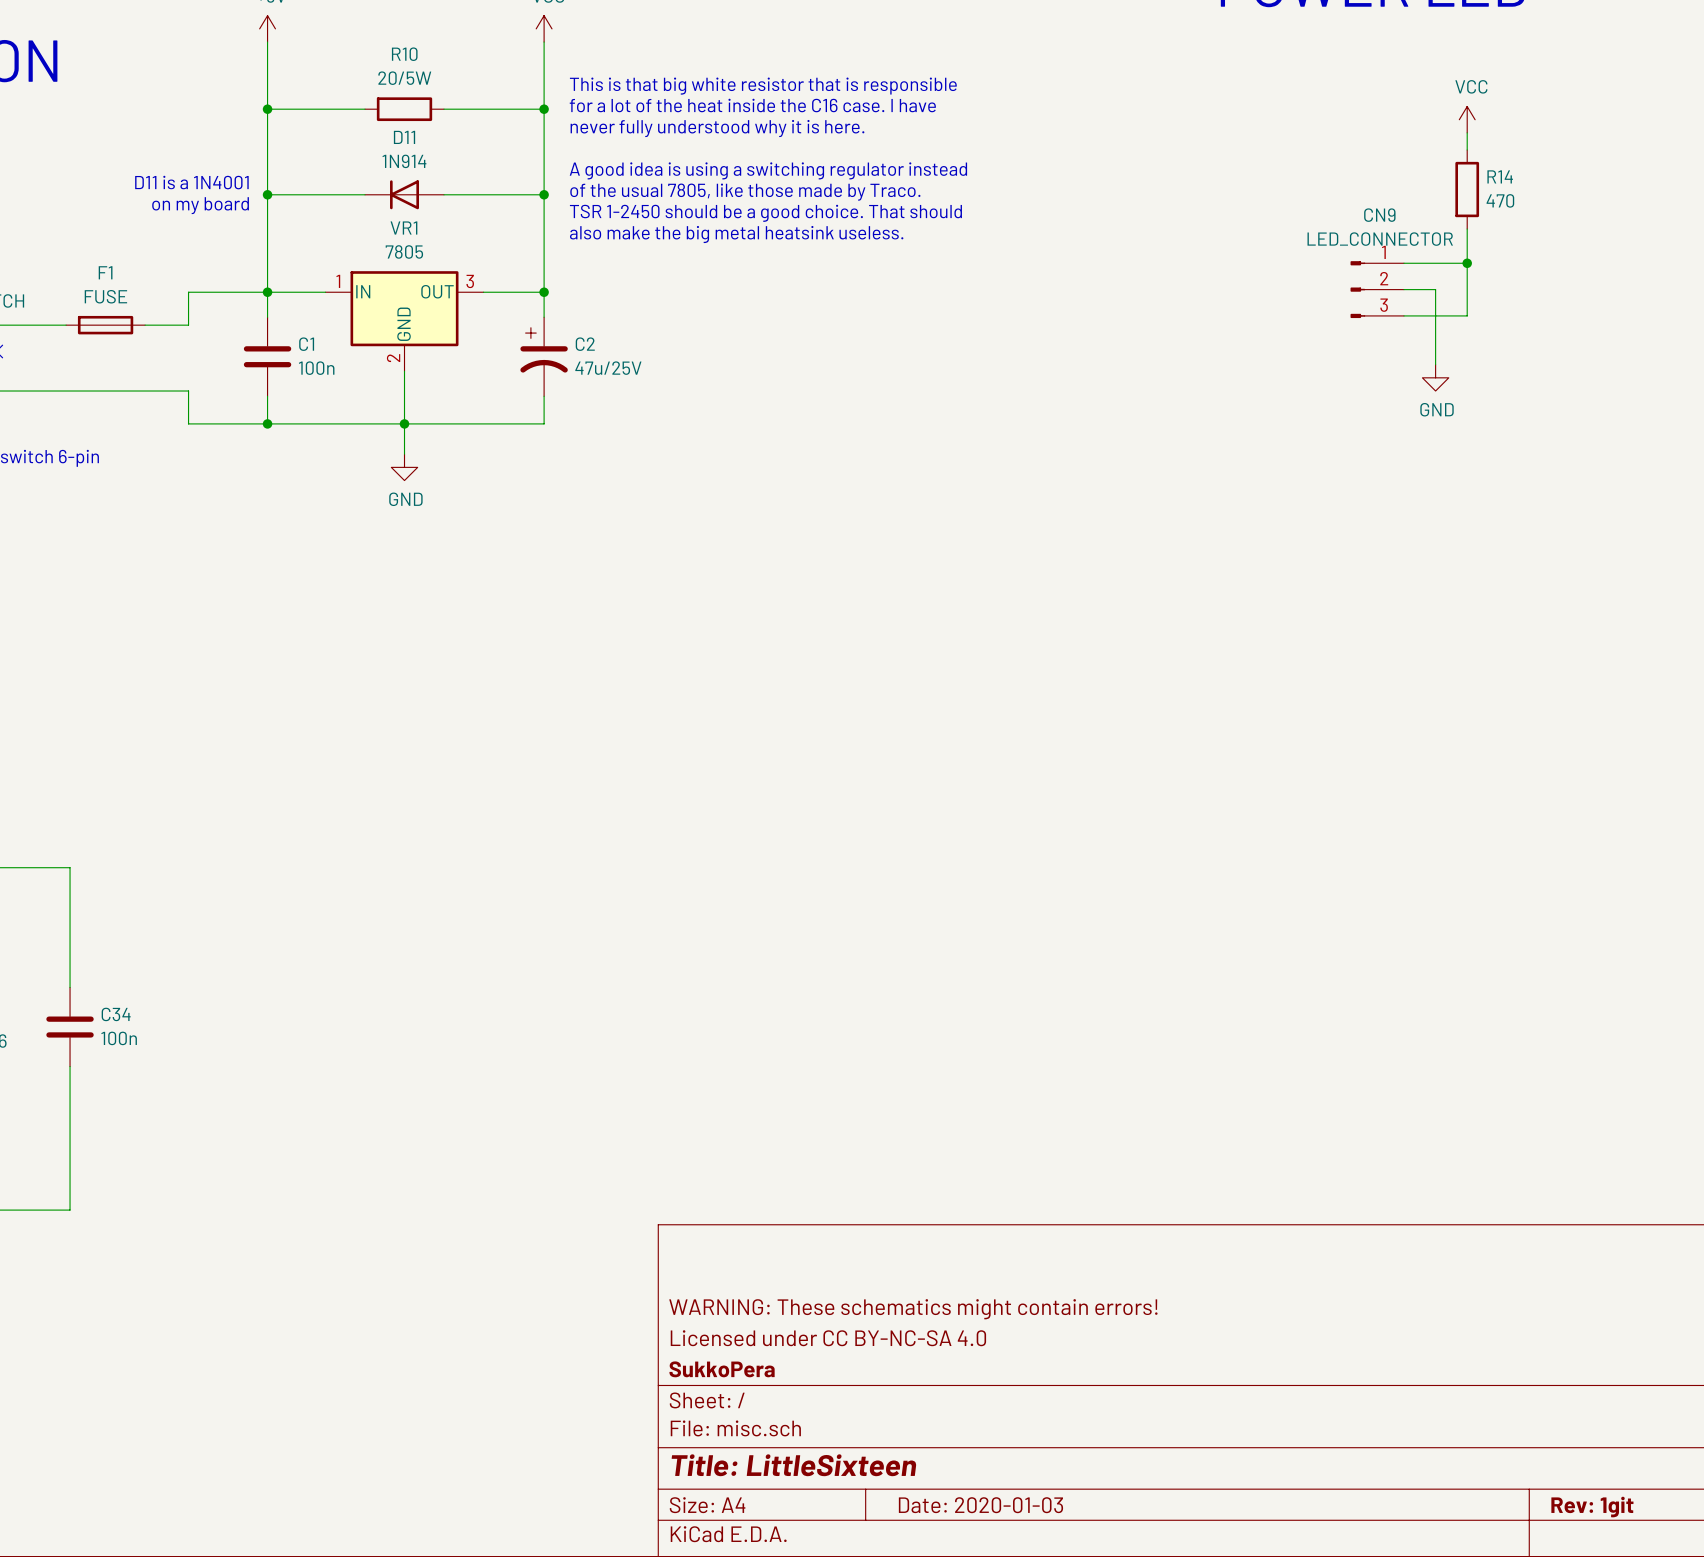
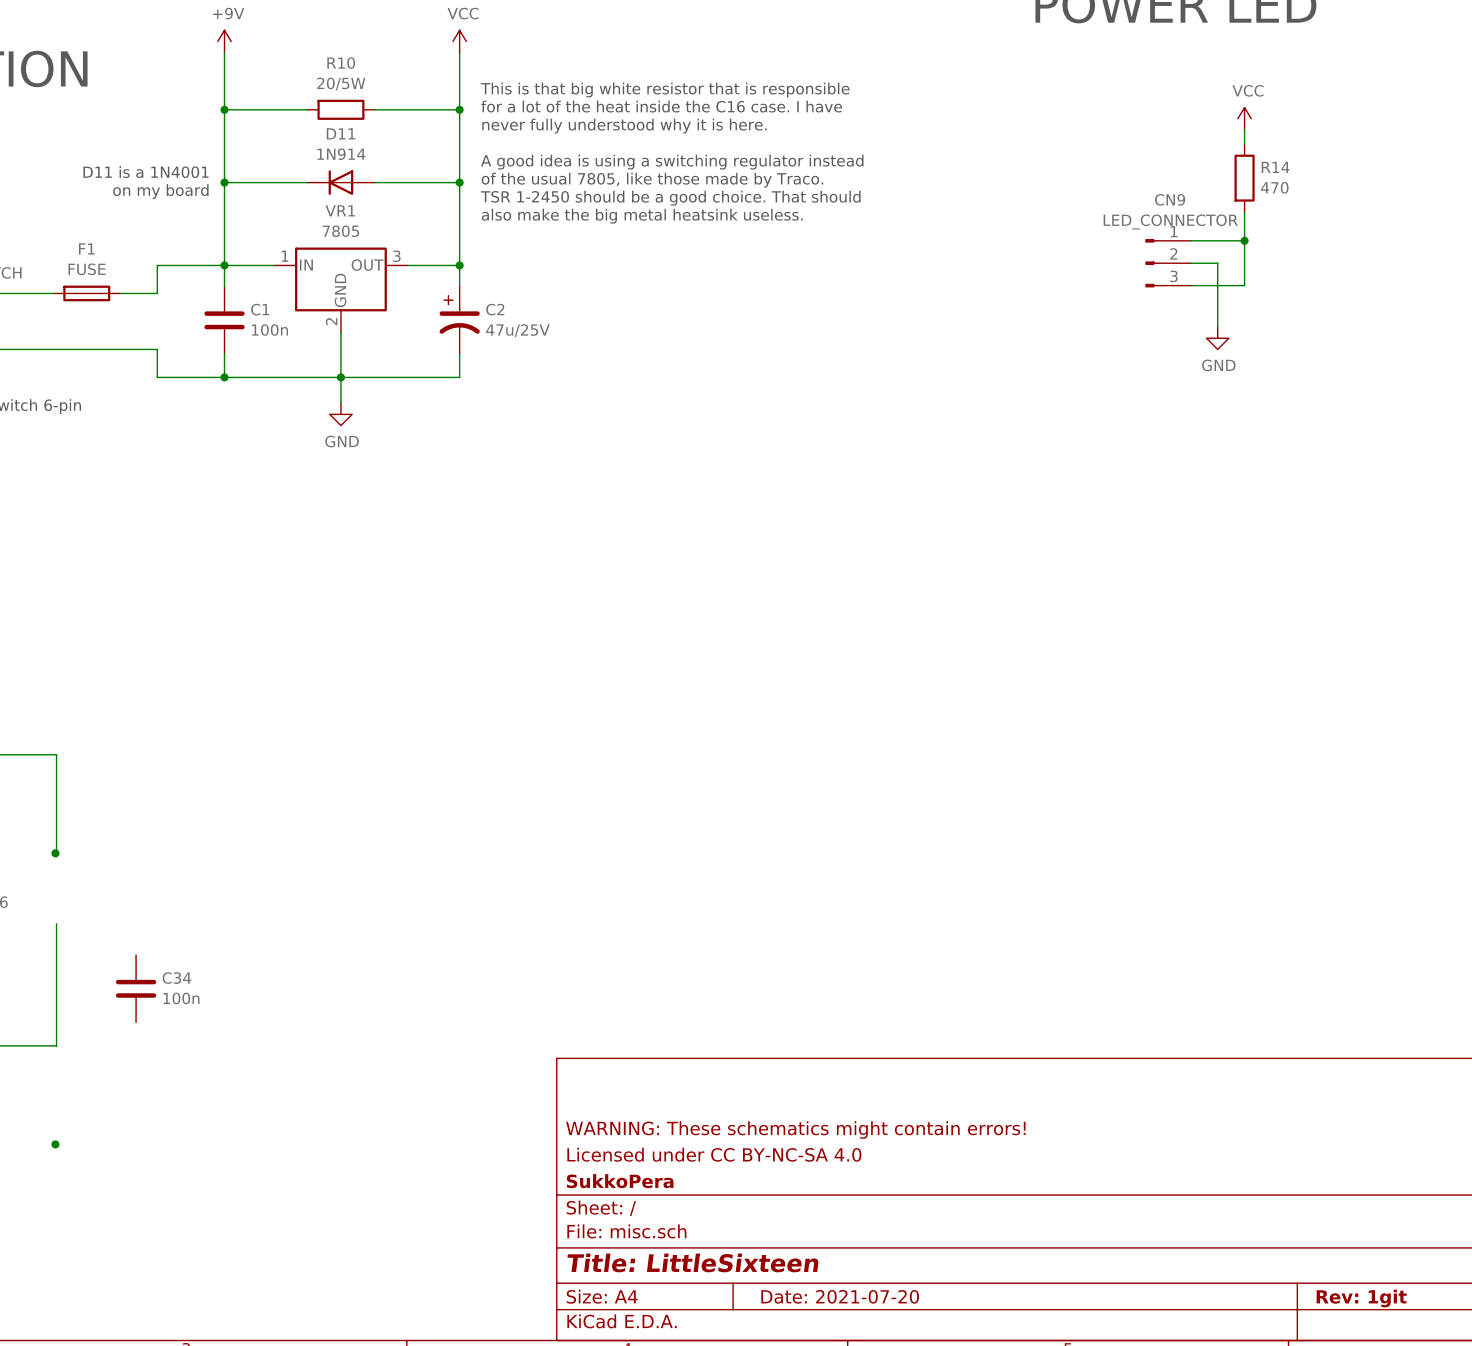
junction: none -> (55, 853)
C34 position: (70, 1027) -> (136, 988)
junction: none -> (55, 1144)
title block: Date: 2020-01-03 (980, 1505) -> Date: 2021-07-20 (840, 1296)

